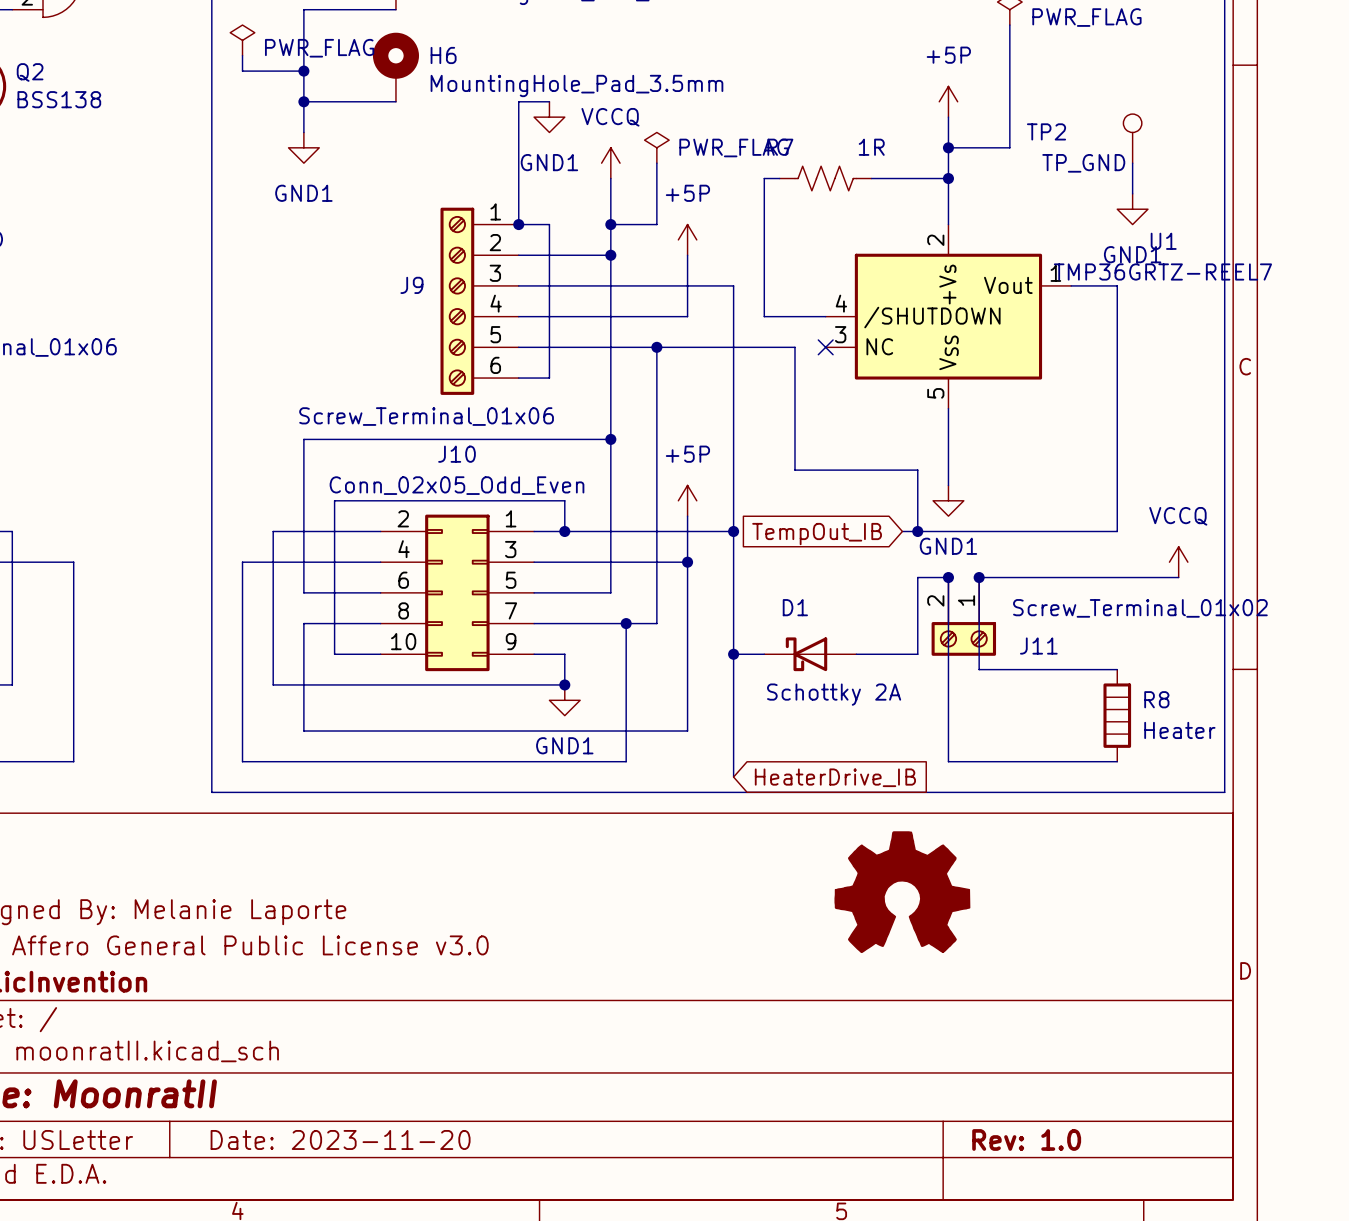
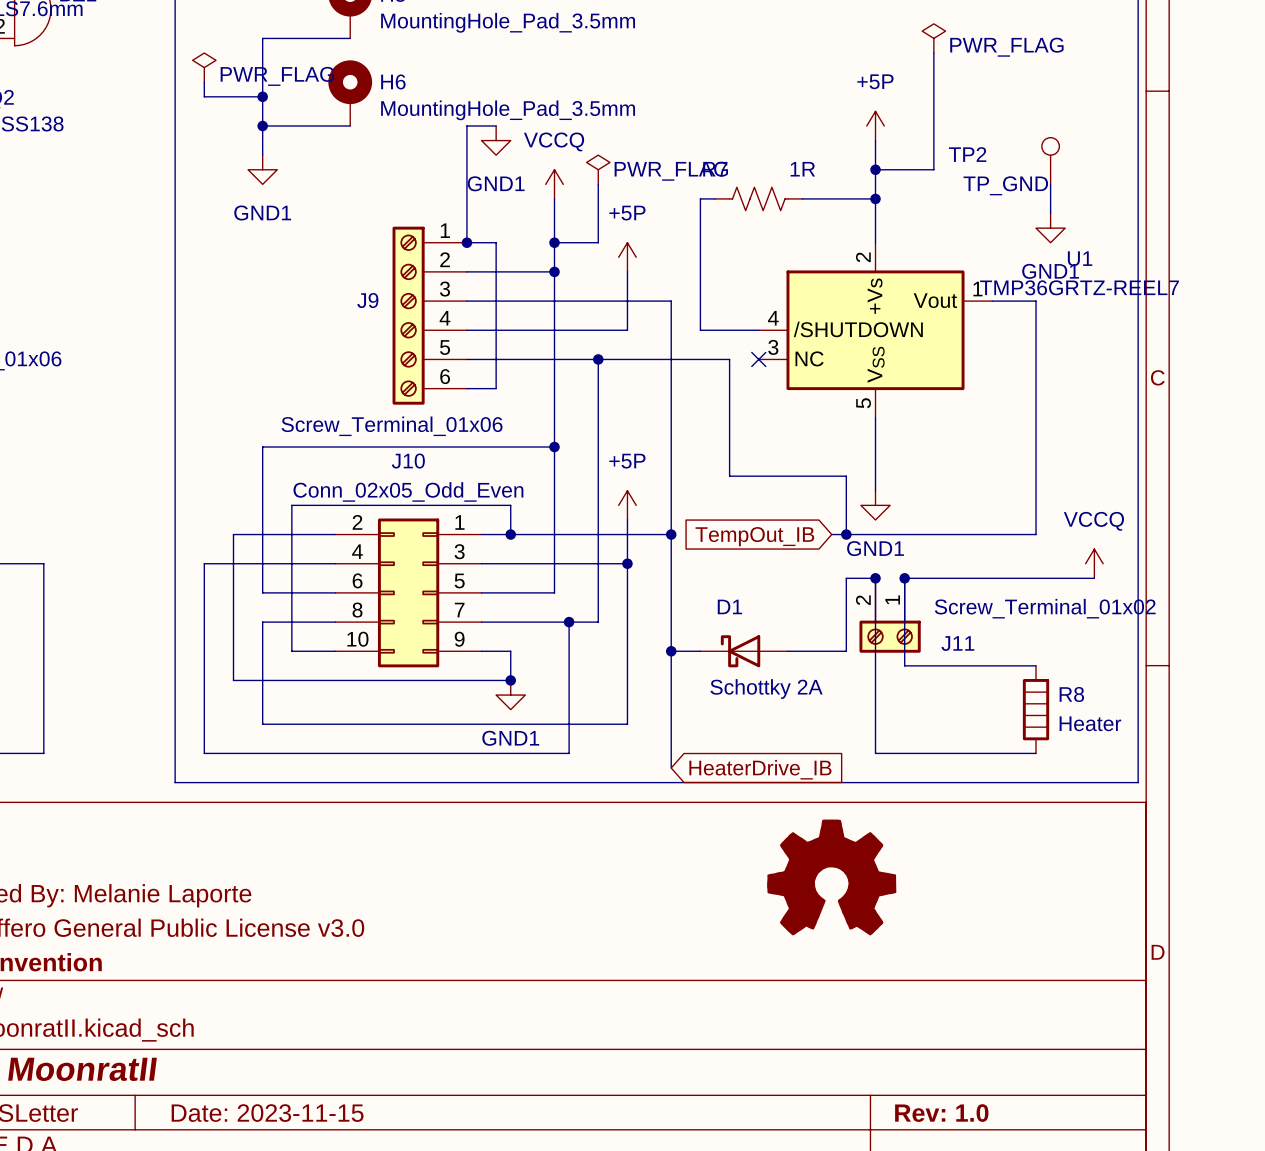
title block: Date: 2023-11-20 (340, 1139) -> Date: 2023-11-15 (267, 1113)

